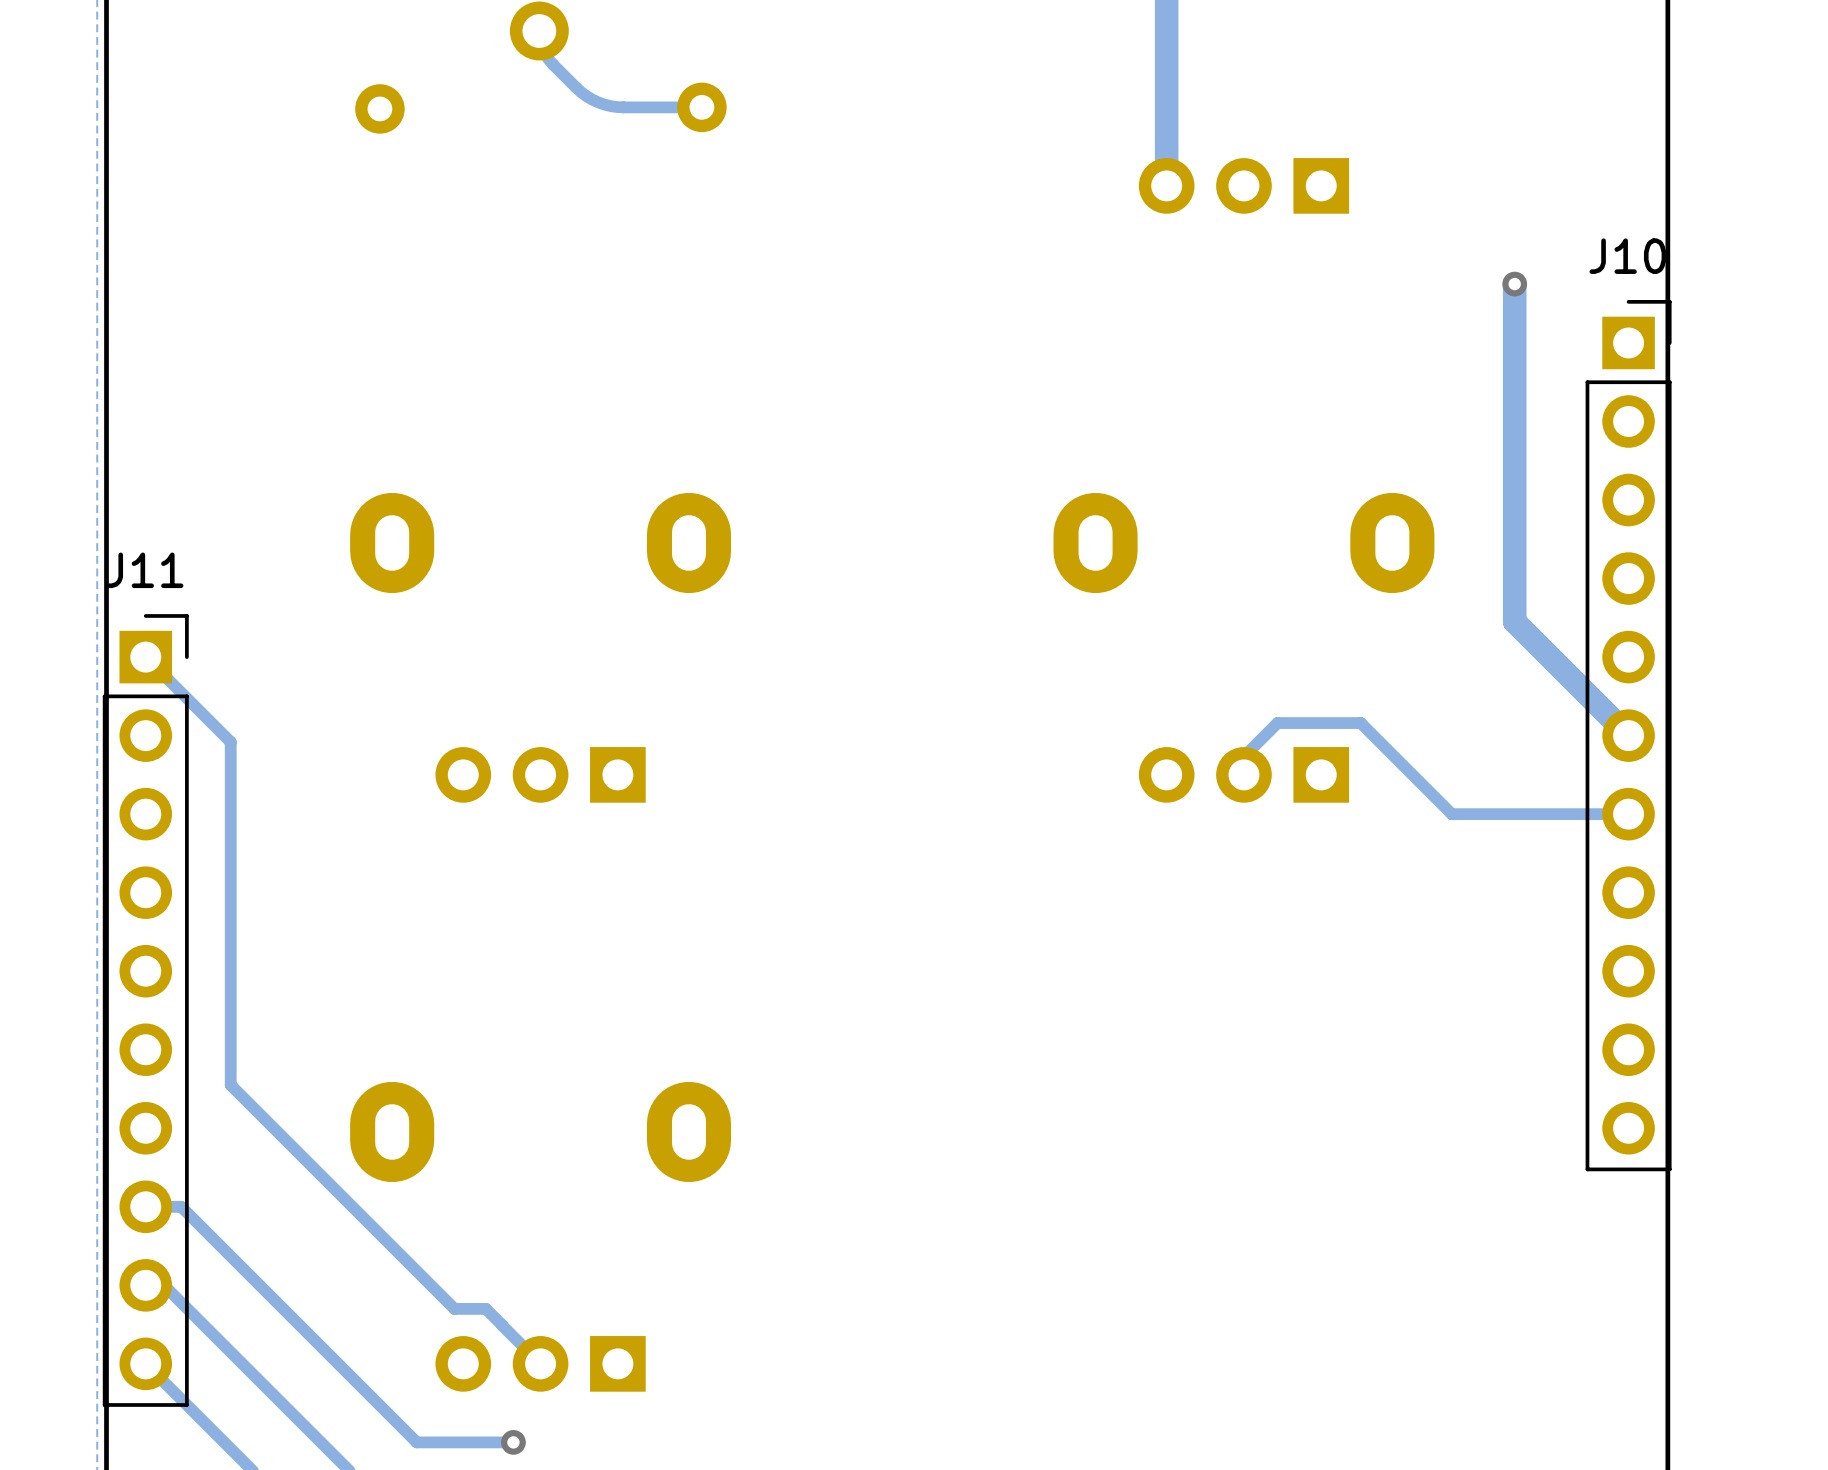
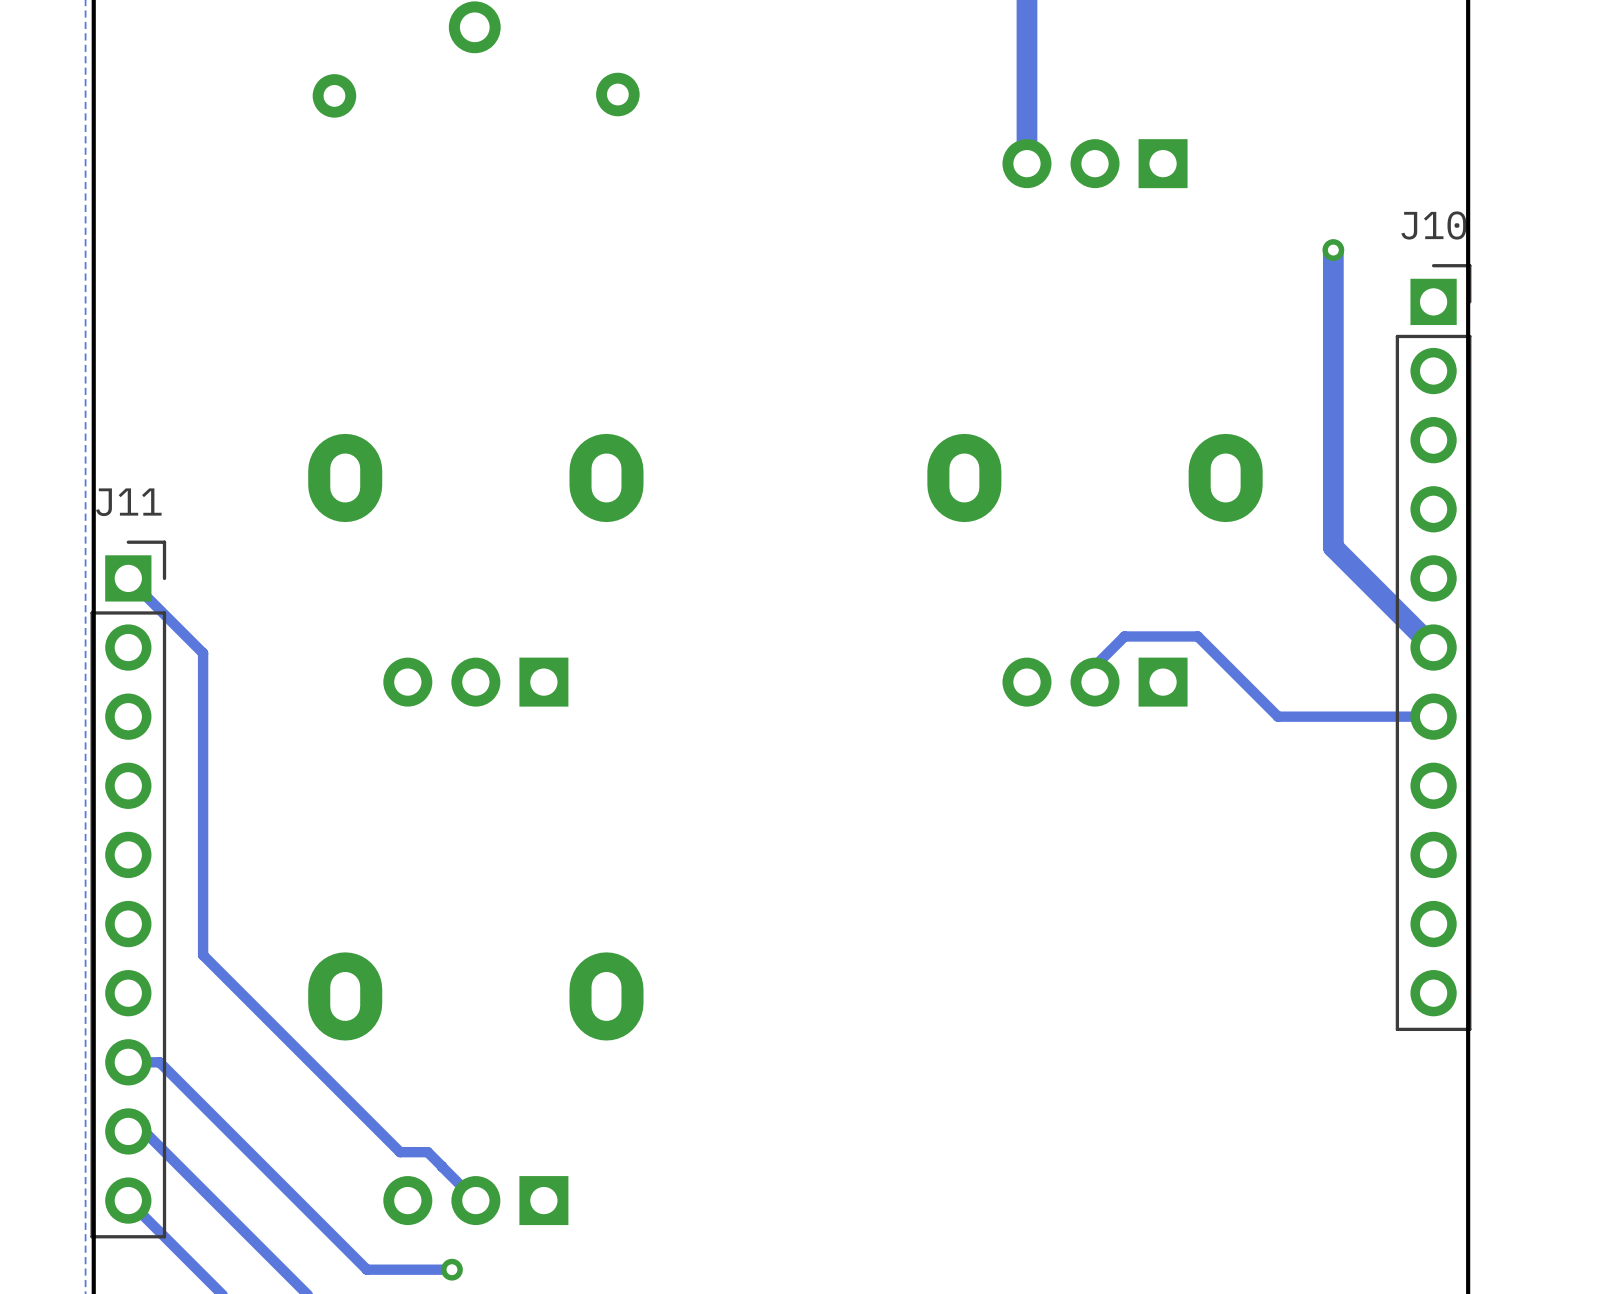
track: (539, 31) (540, 43) (549, 60) (581, 92) (598, 102) (623, 107) (701, 107) -> none

